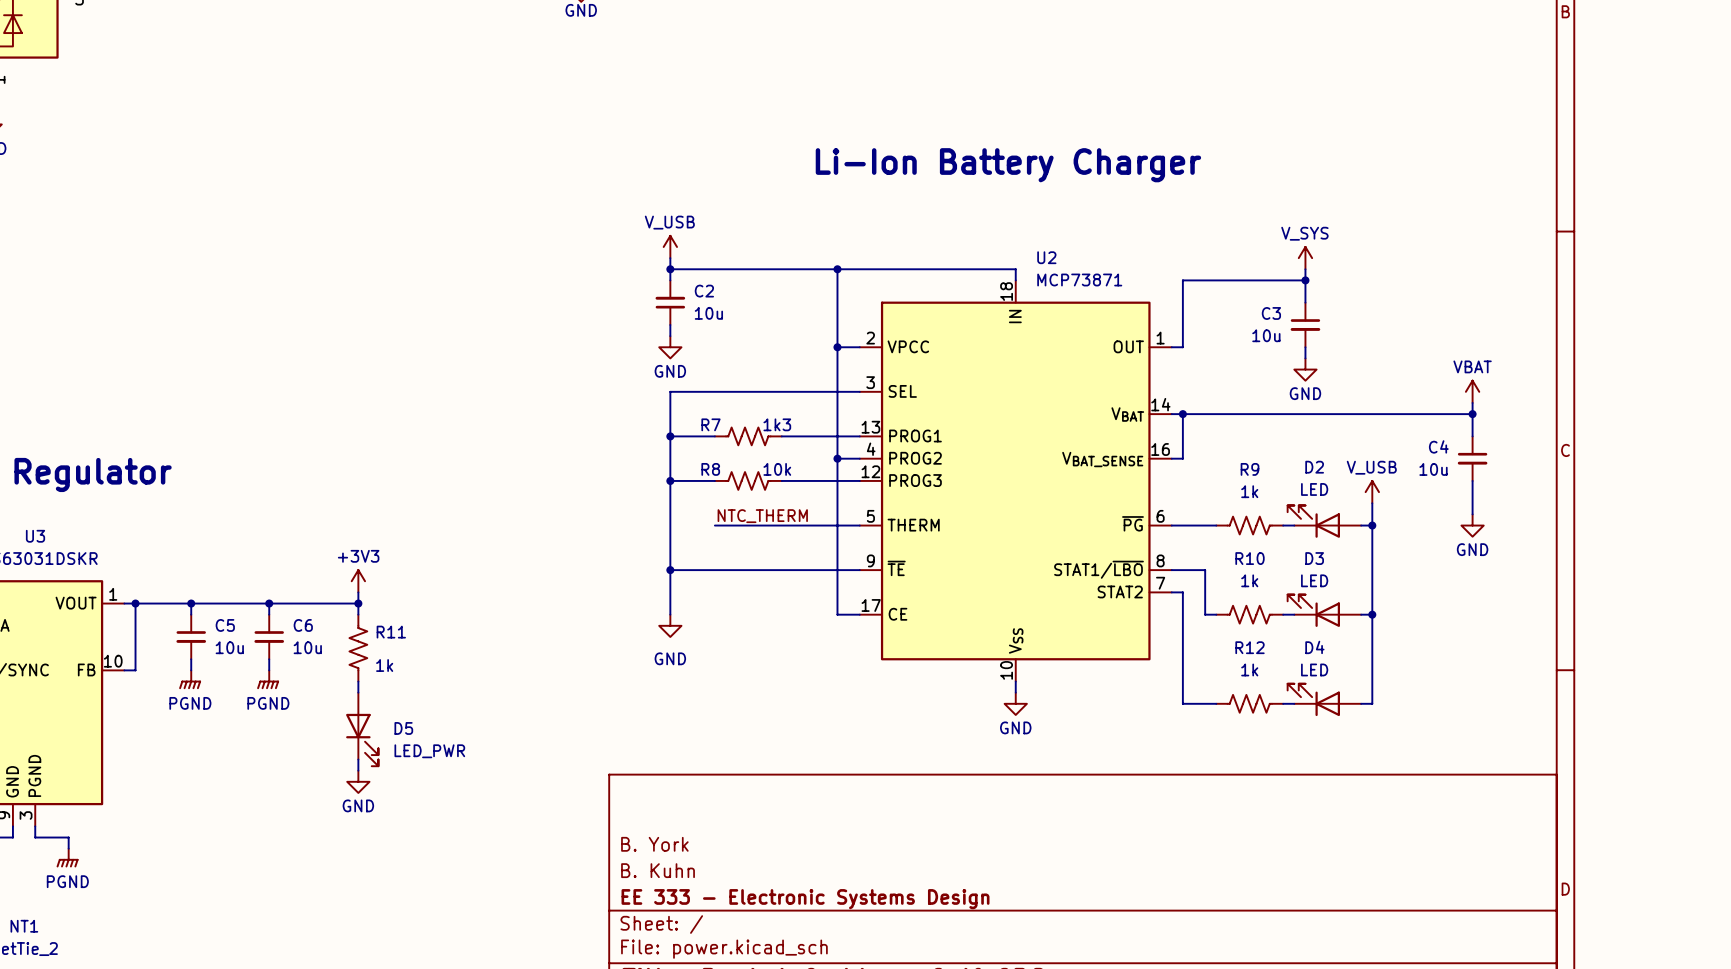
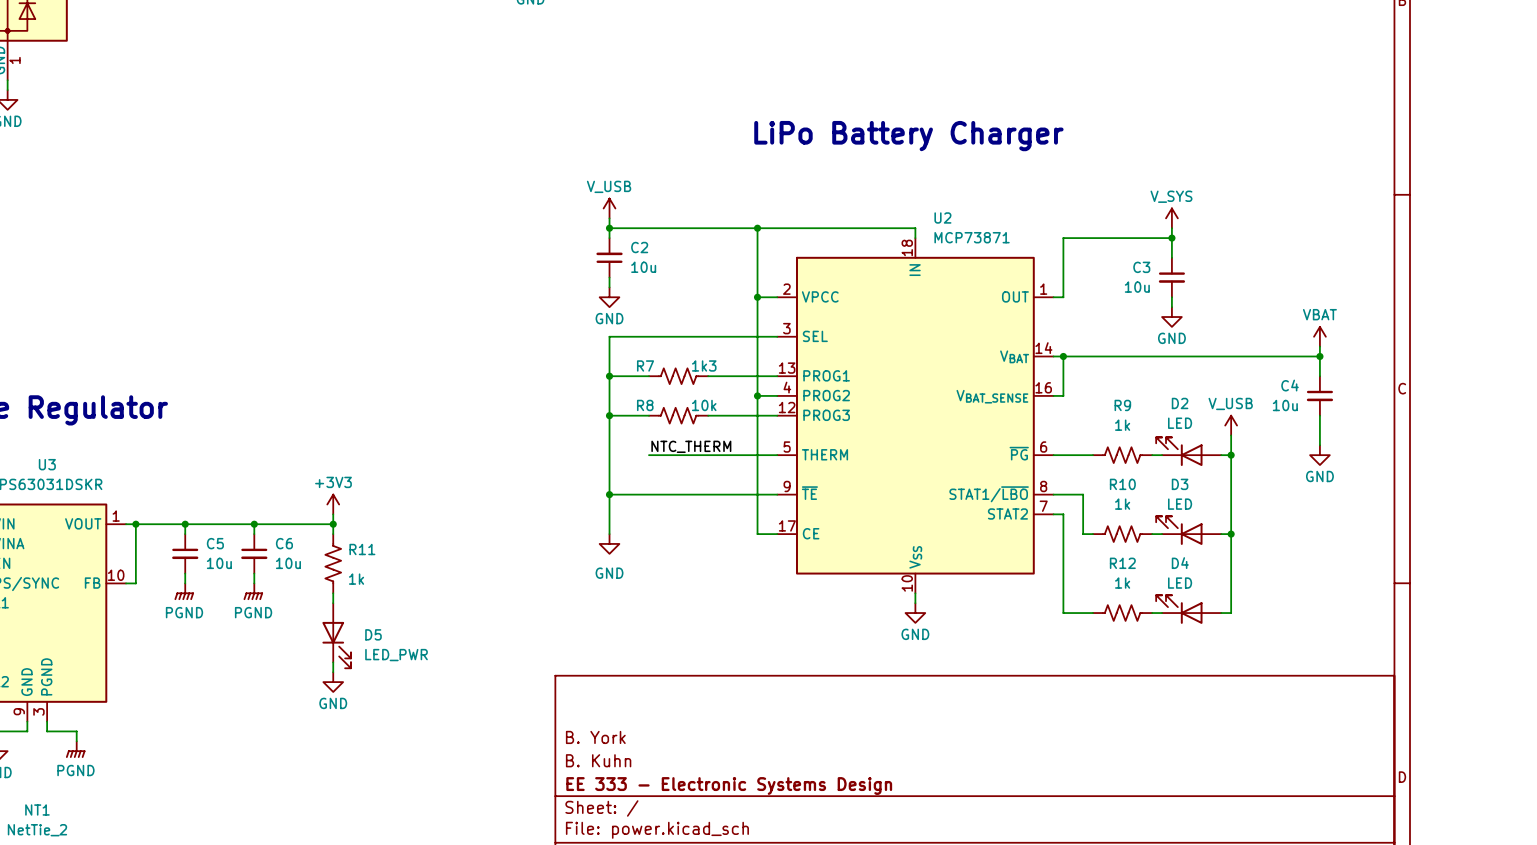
text: Li-Ion Battery Charger (1008, 165) -> LiPo Battery Charger (908, 136)

